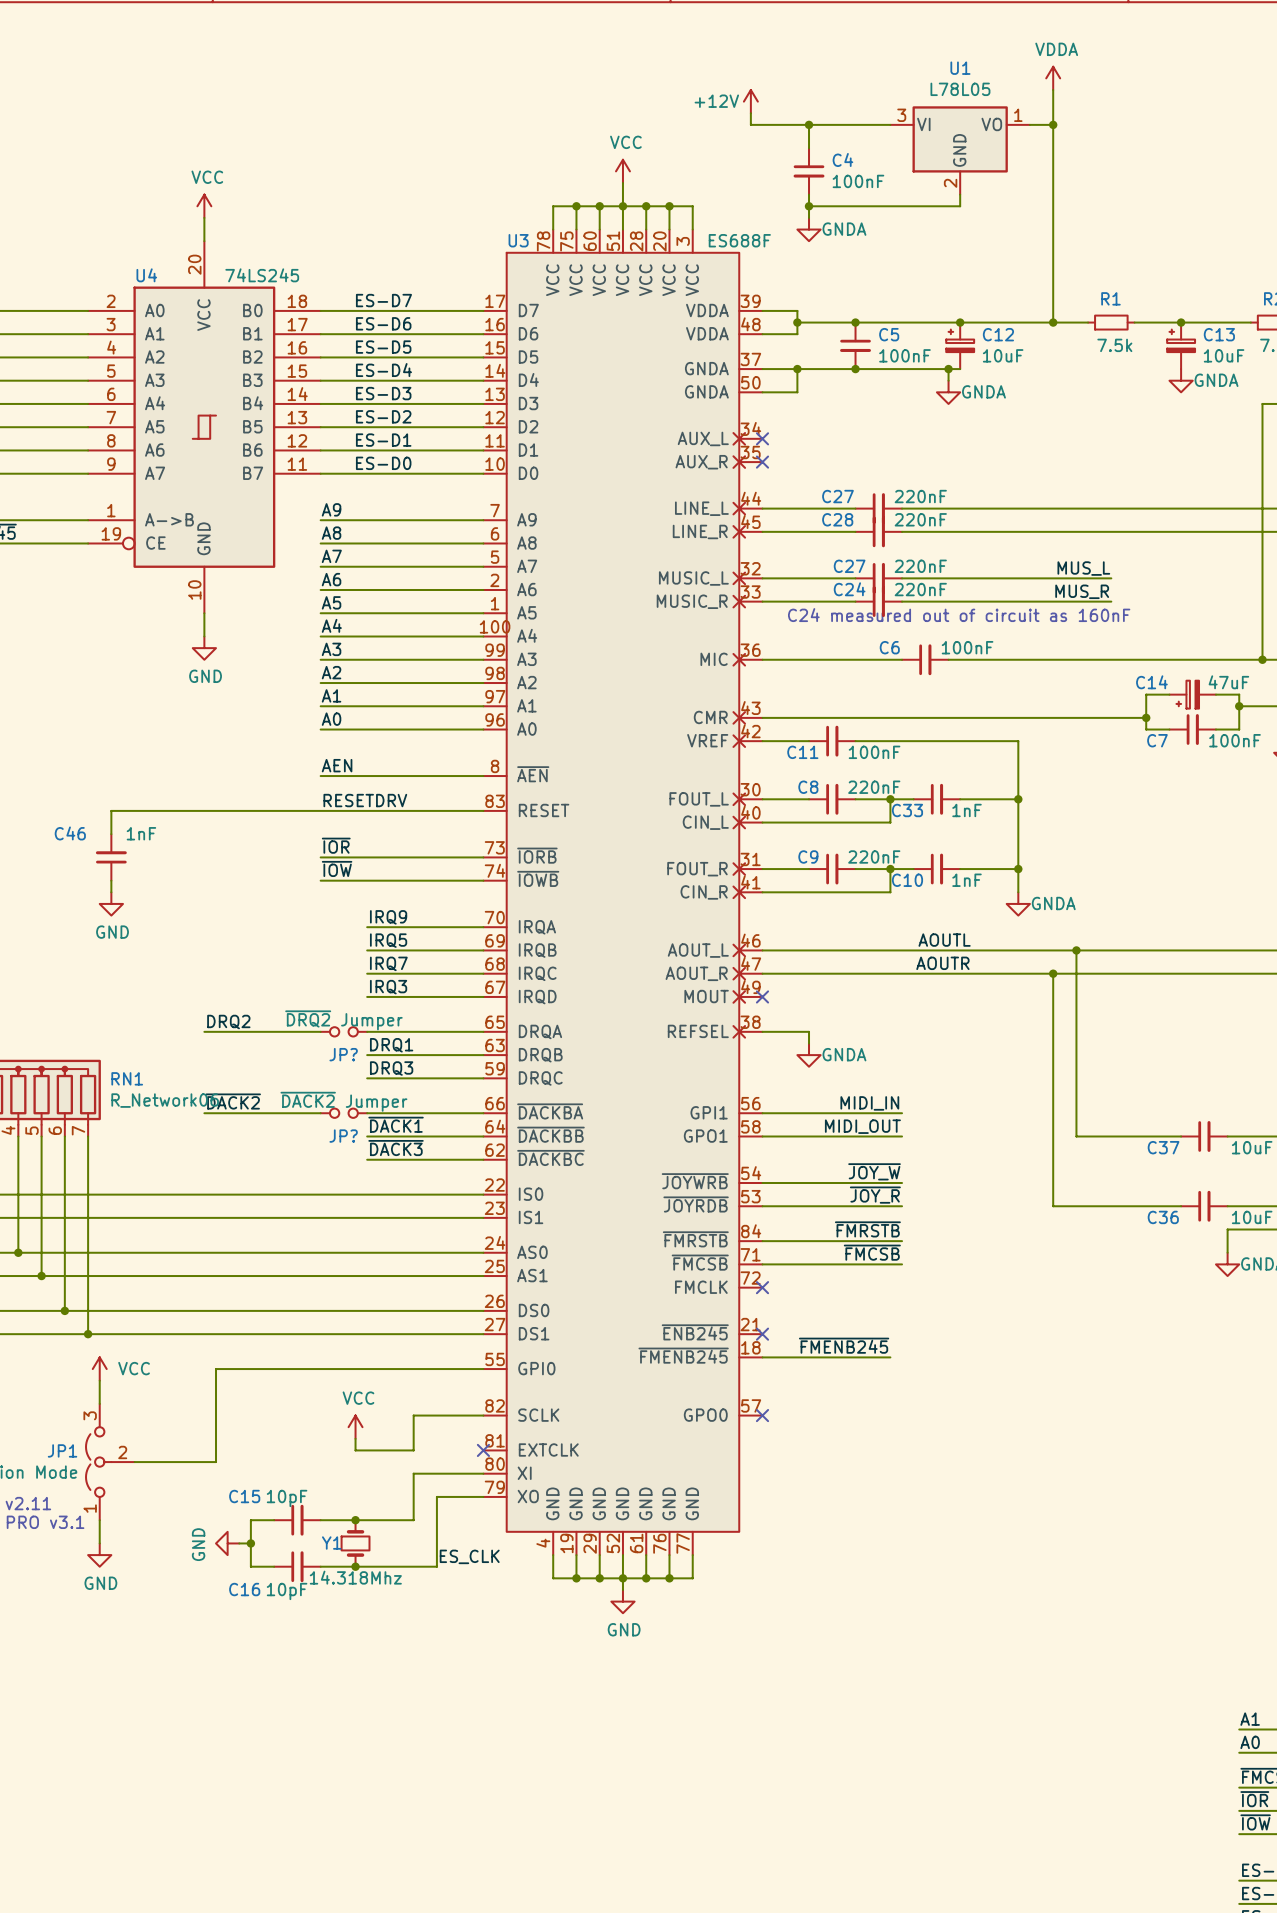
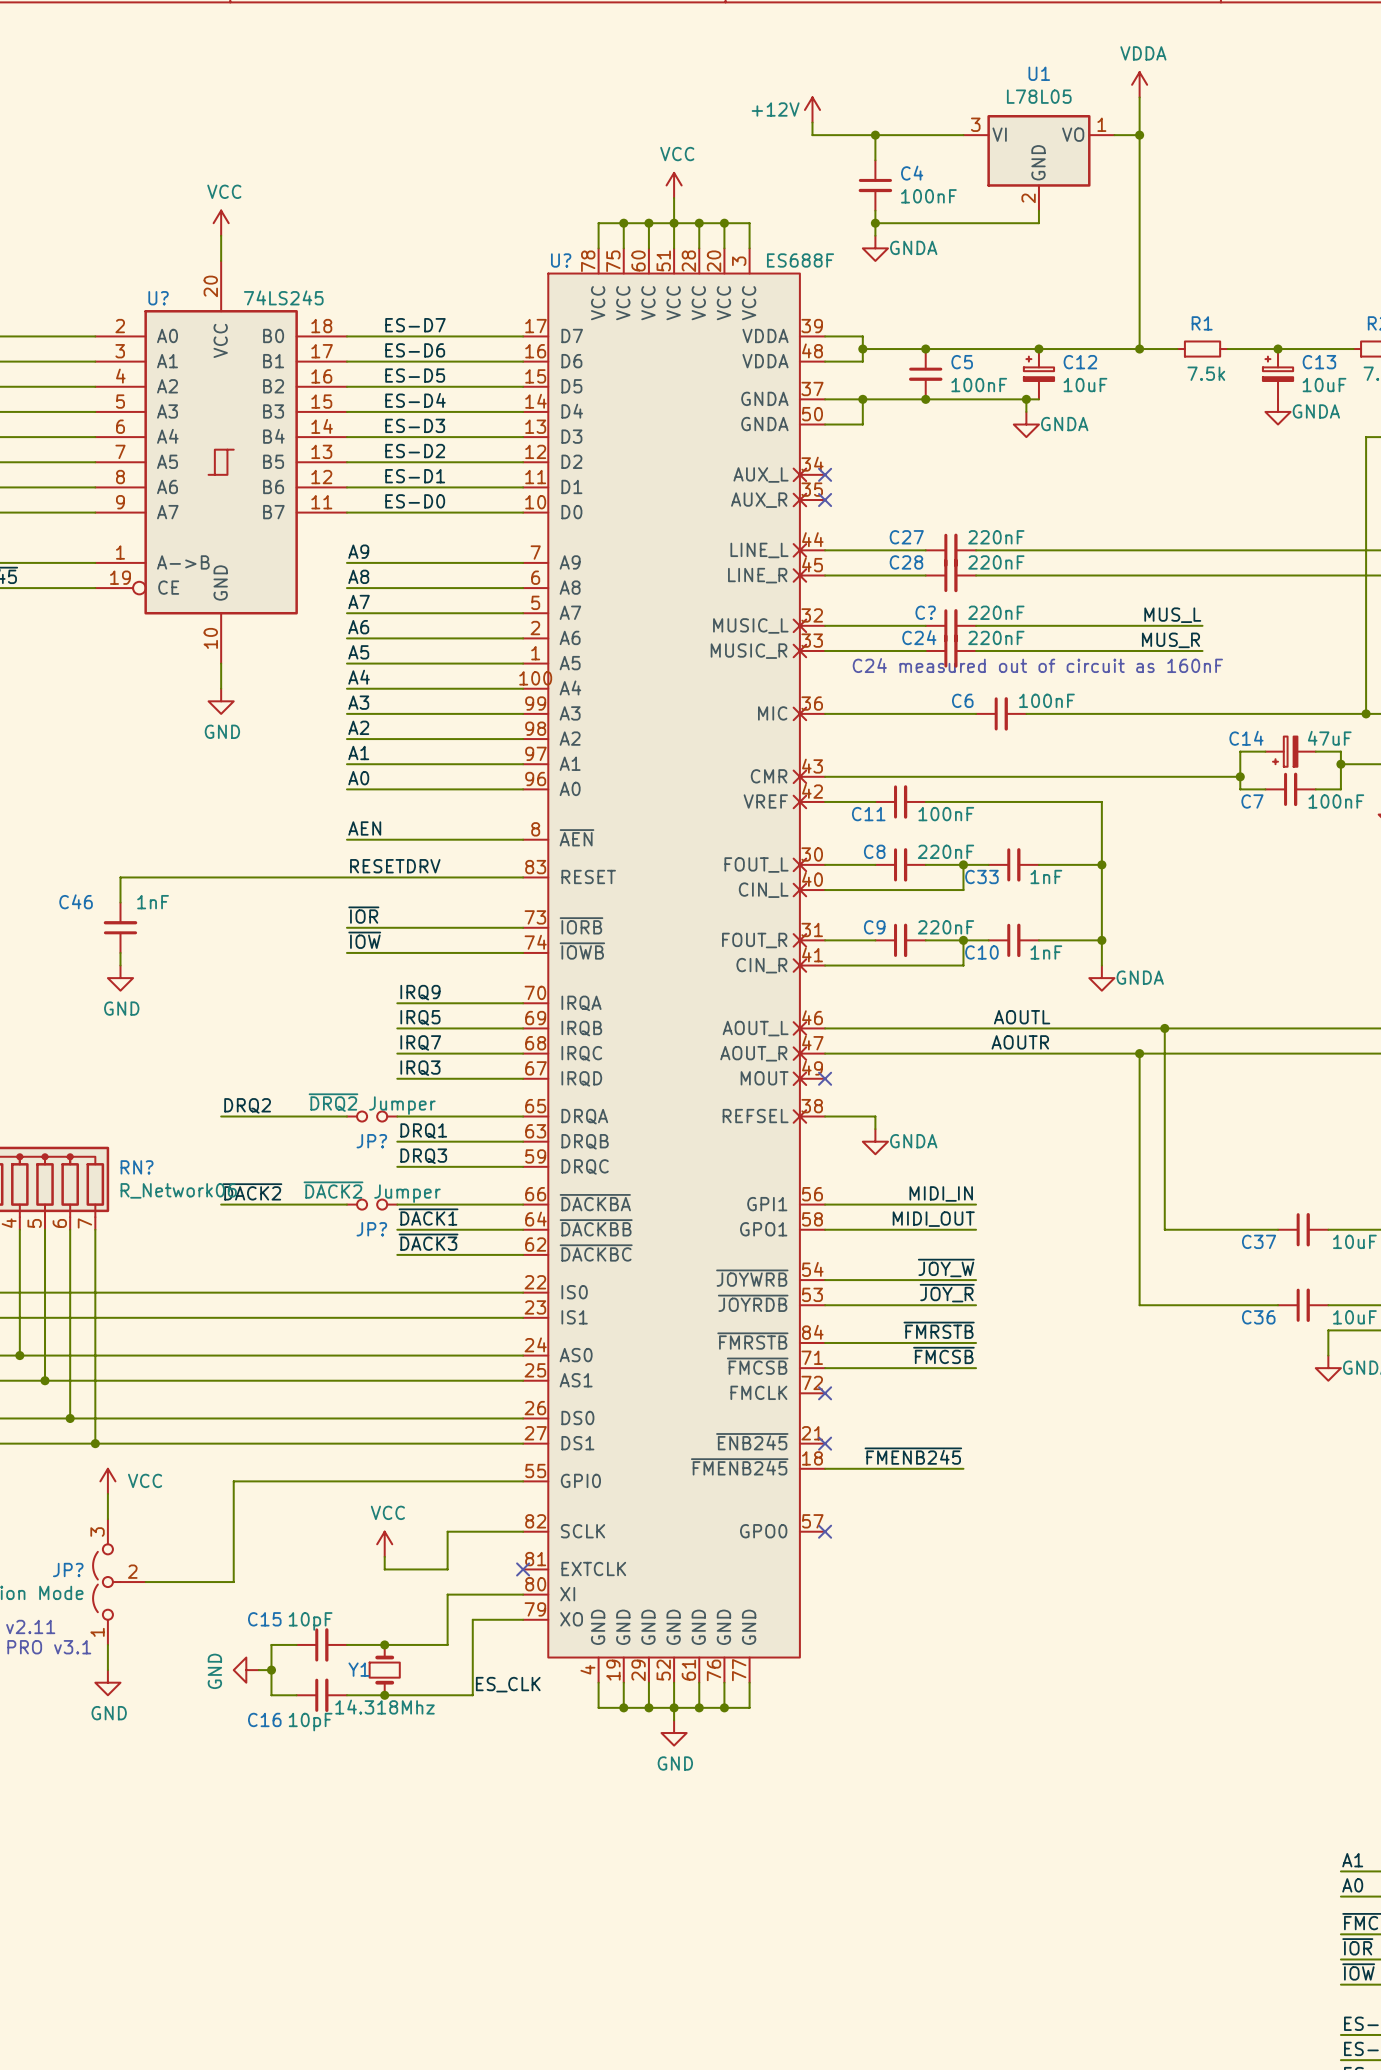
U3 name: U3 (518, 240) -> U? (561, 260)
U4 name: U4 (146, 275) -> U? (158, 298)
C27 name: C27 (849, 566) -> C? (925, 612)
RN1 name: RN1 (127, 1078) -> RN? (137, 1167)
JP1 name: JP1 (62, 1450) -> JP? (68, 1569)

